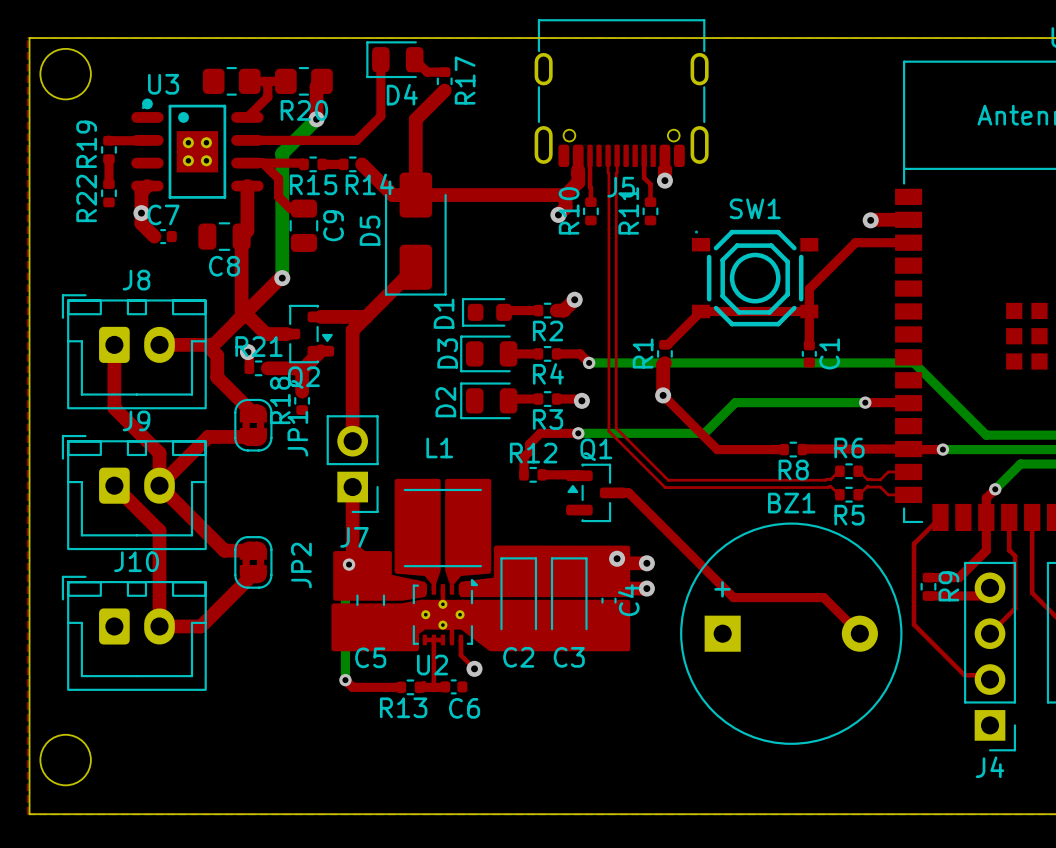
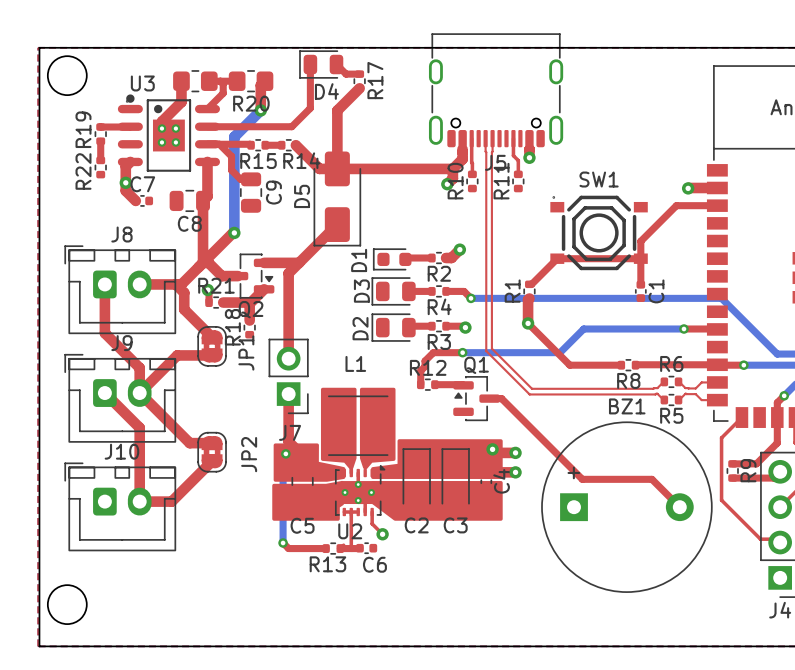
top track: none -> (181, 81) (181, 102) (161, 121) (161, 128)

